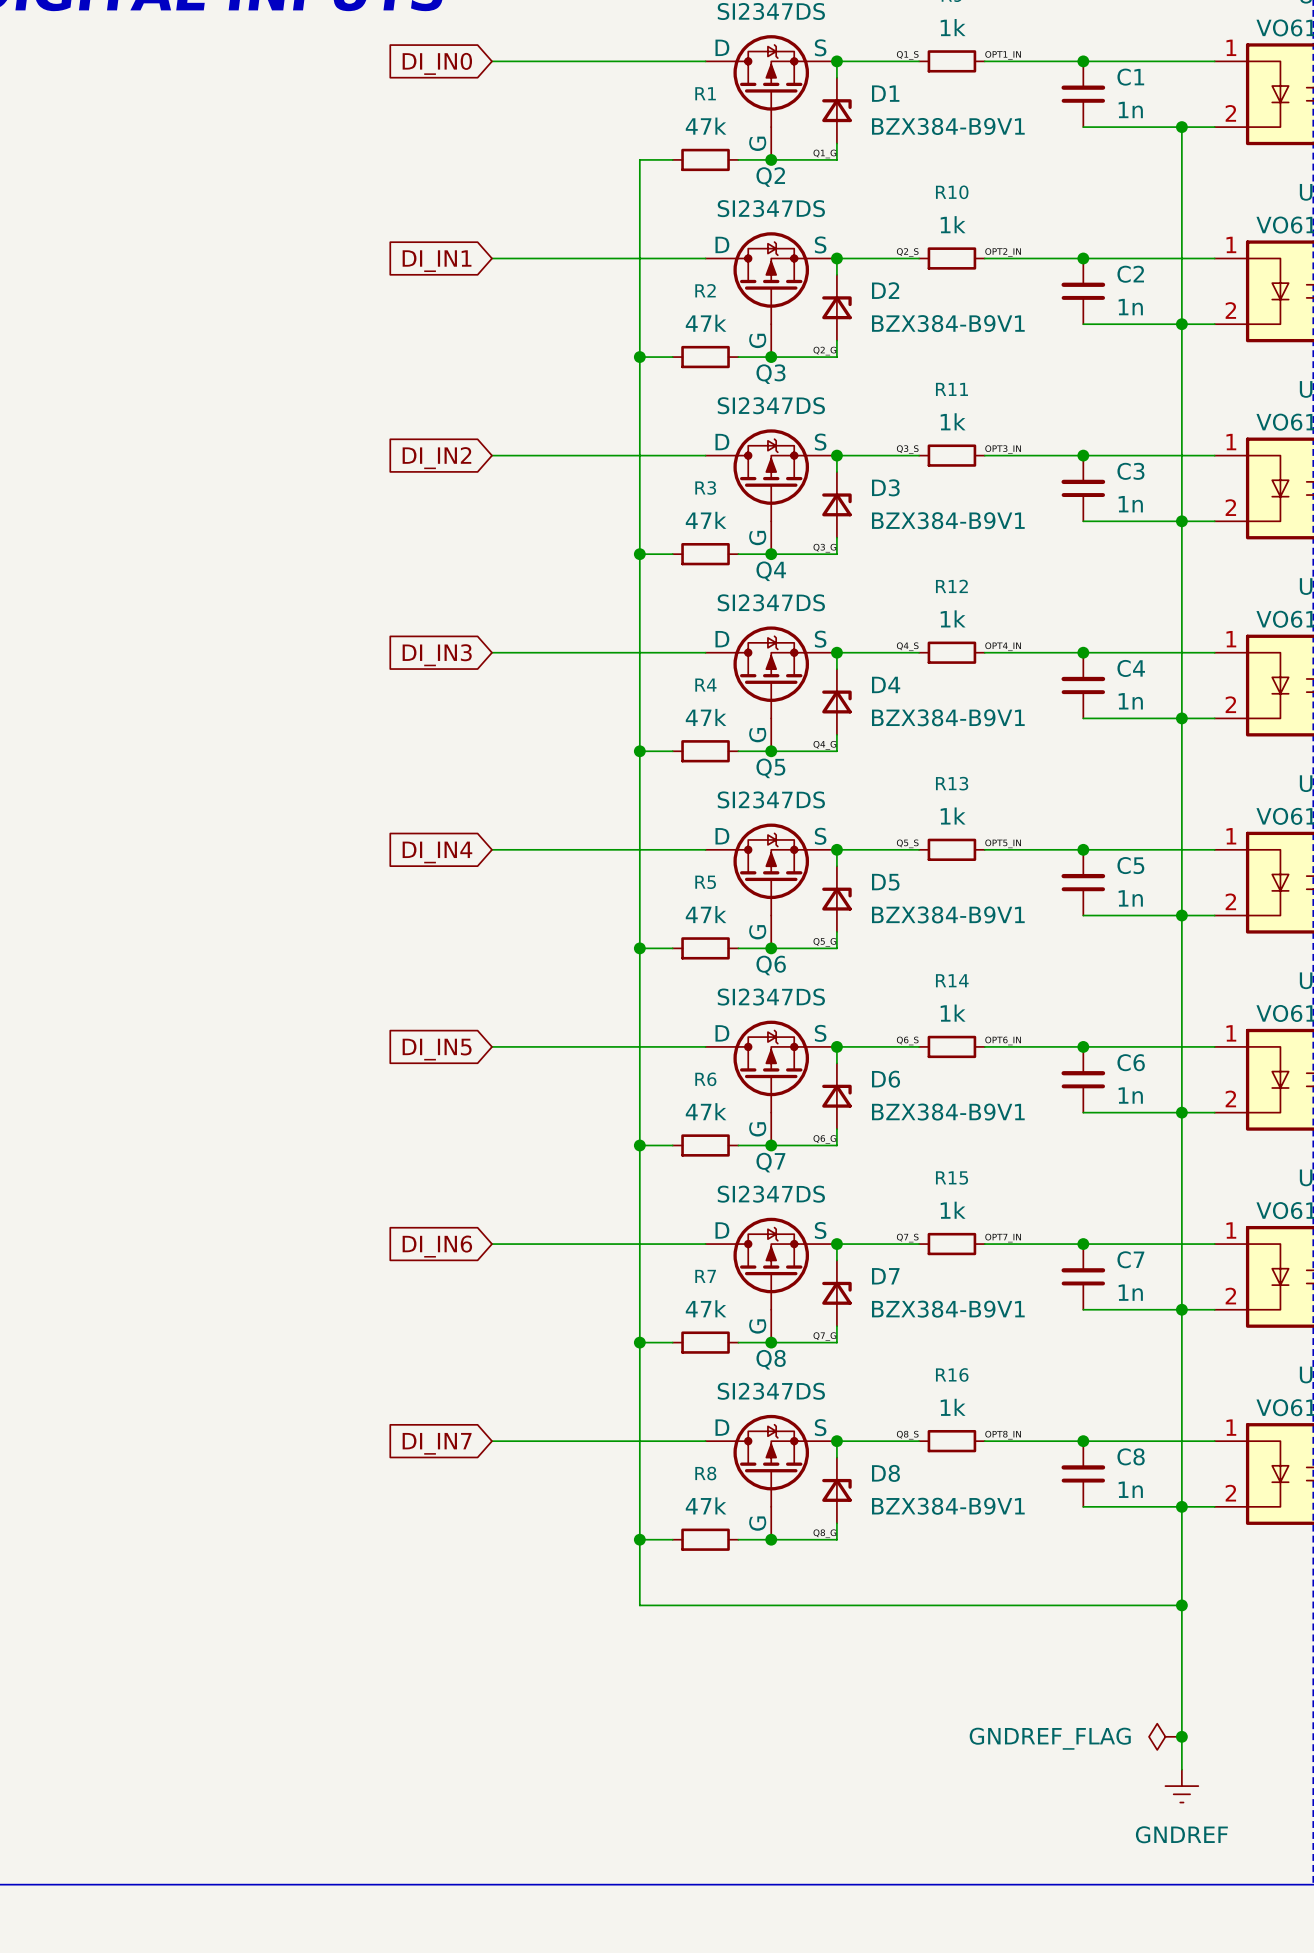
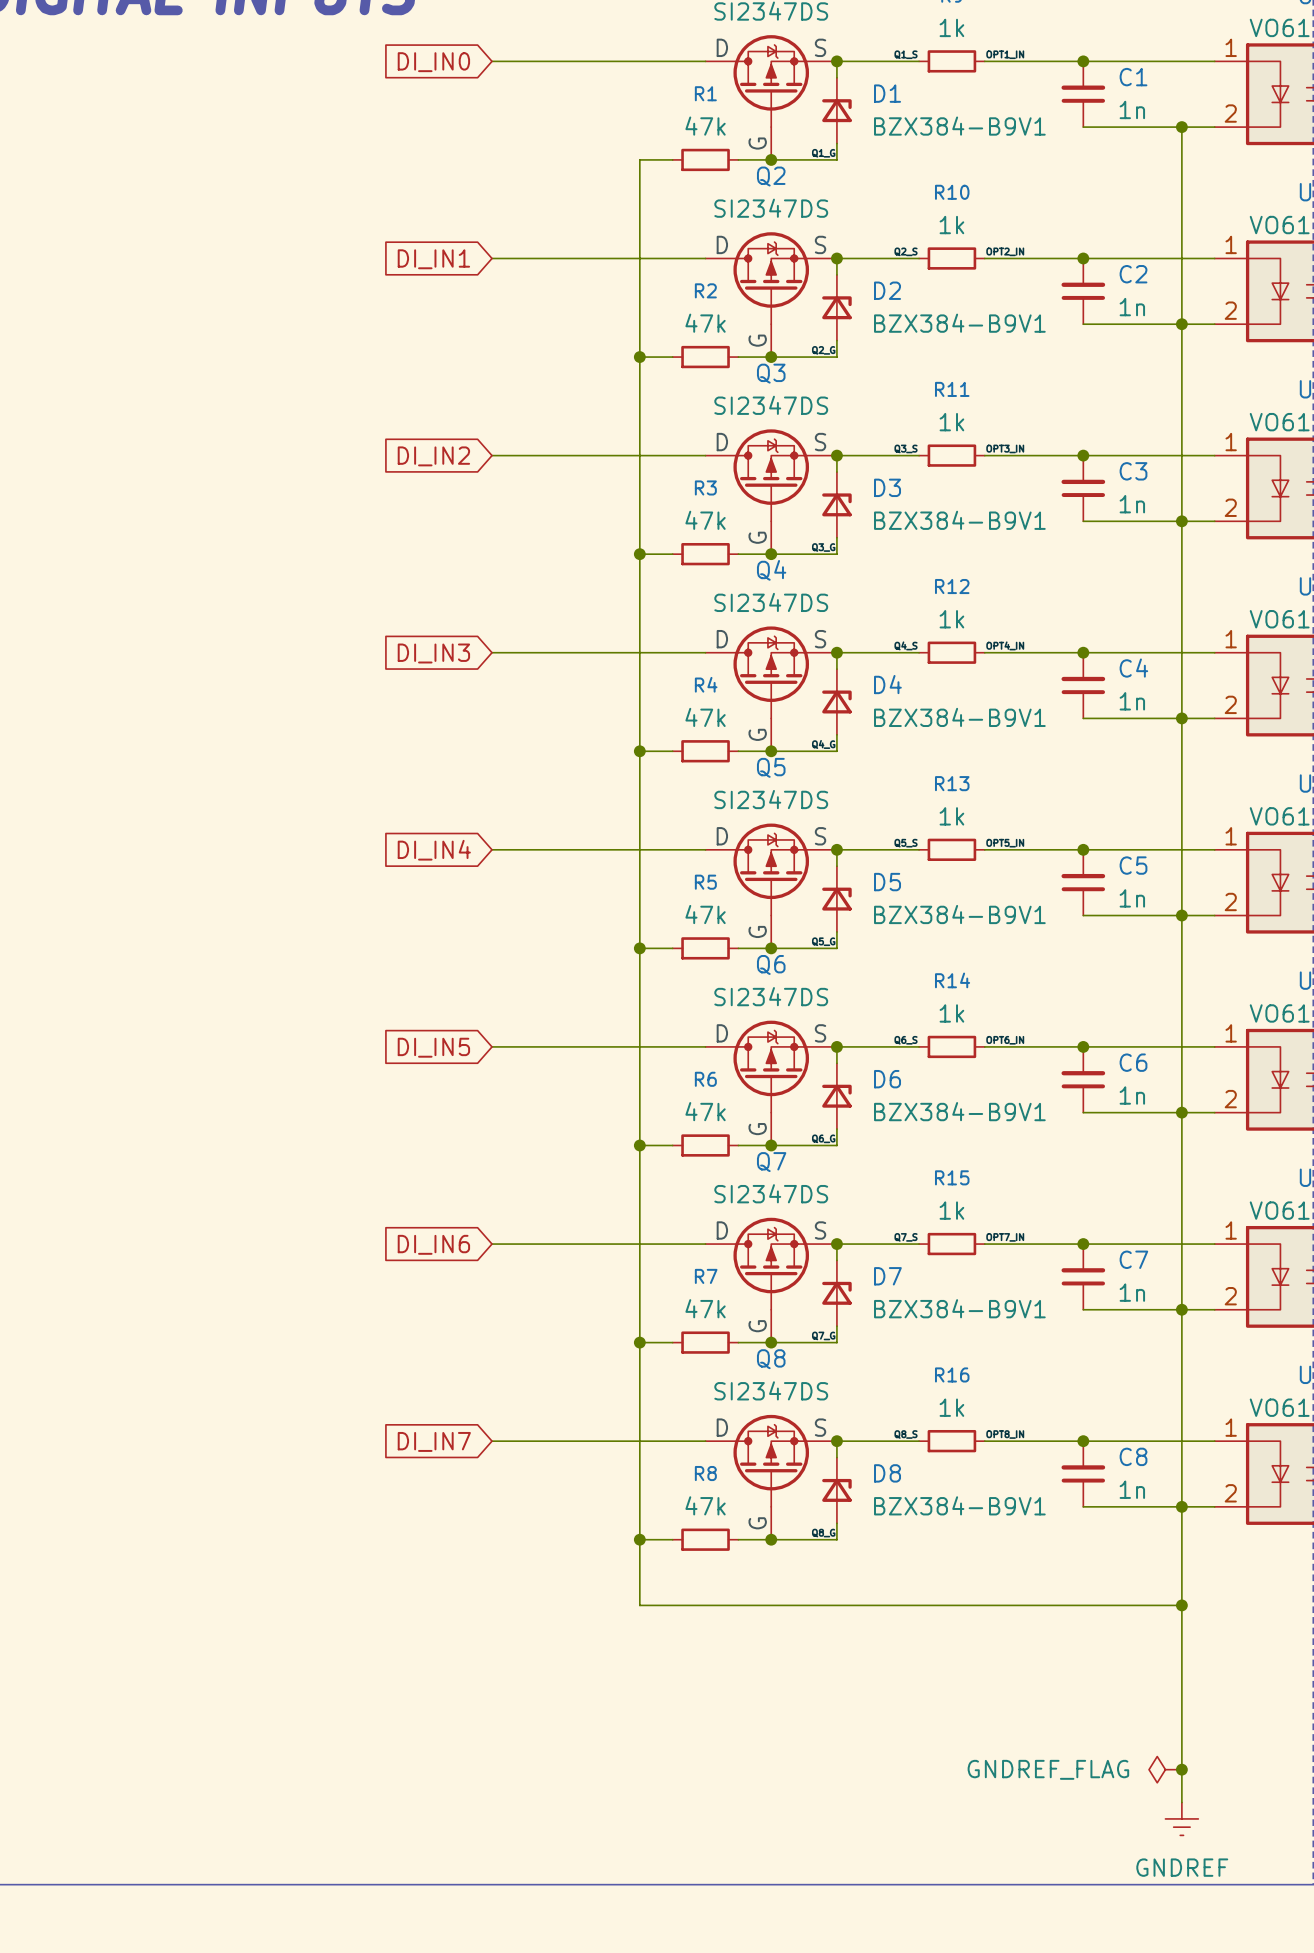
power symbol position: GNDREF_FLAG (1165, 1736) -> GNDREF_FLAG (1165, 1769)
junction position: (1181, 1736) -> (1181, 1769)
power symbol position: GNDREF (1181, 1786) -> GNDREF (1181, 1818)

